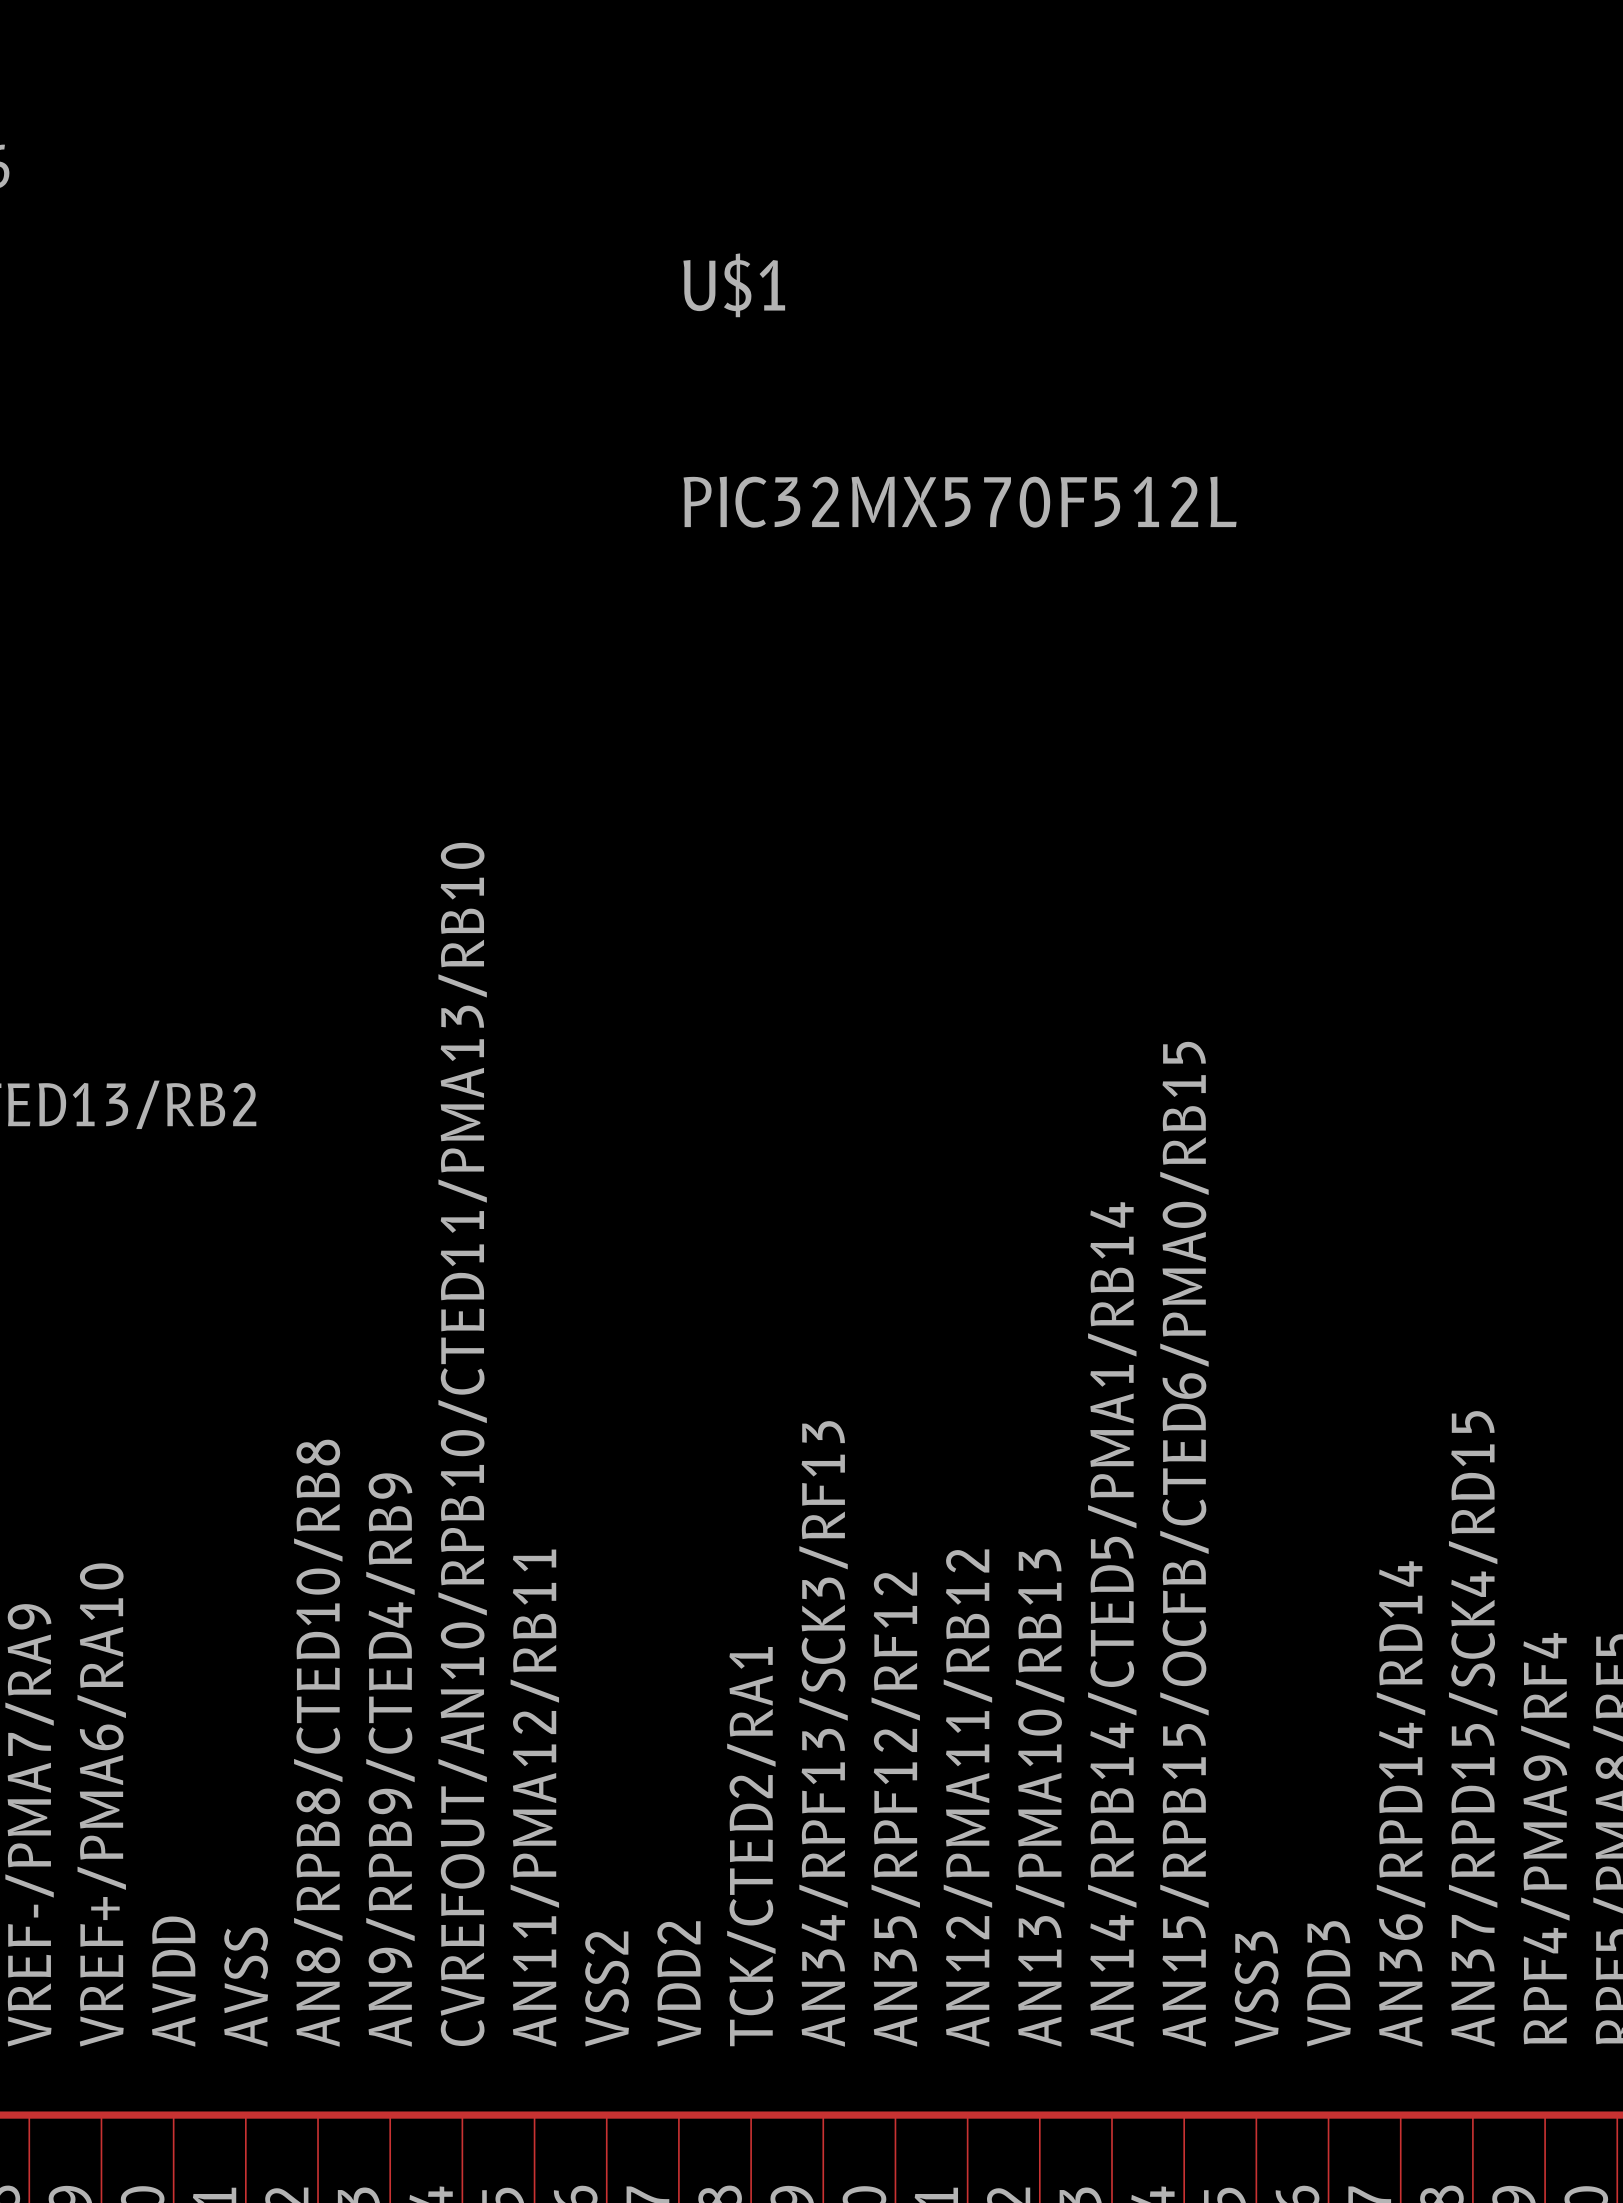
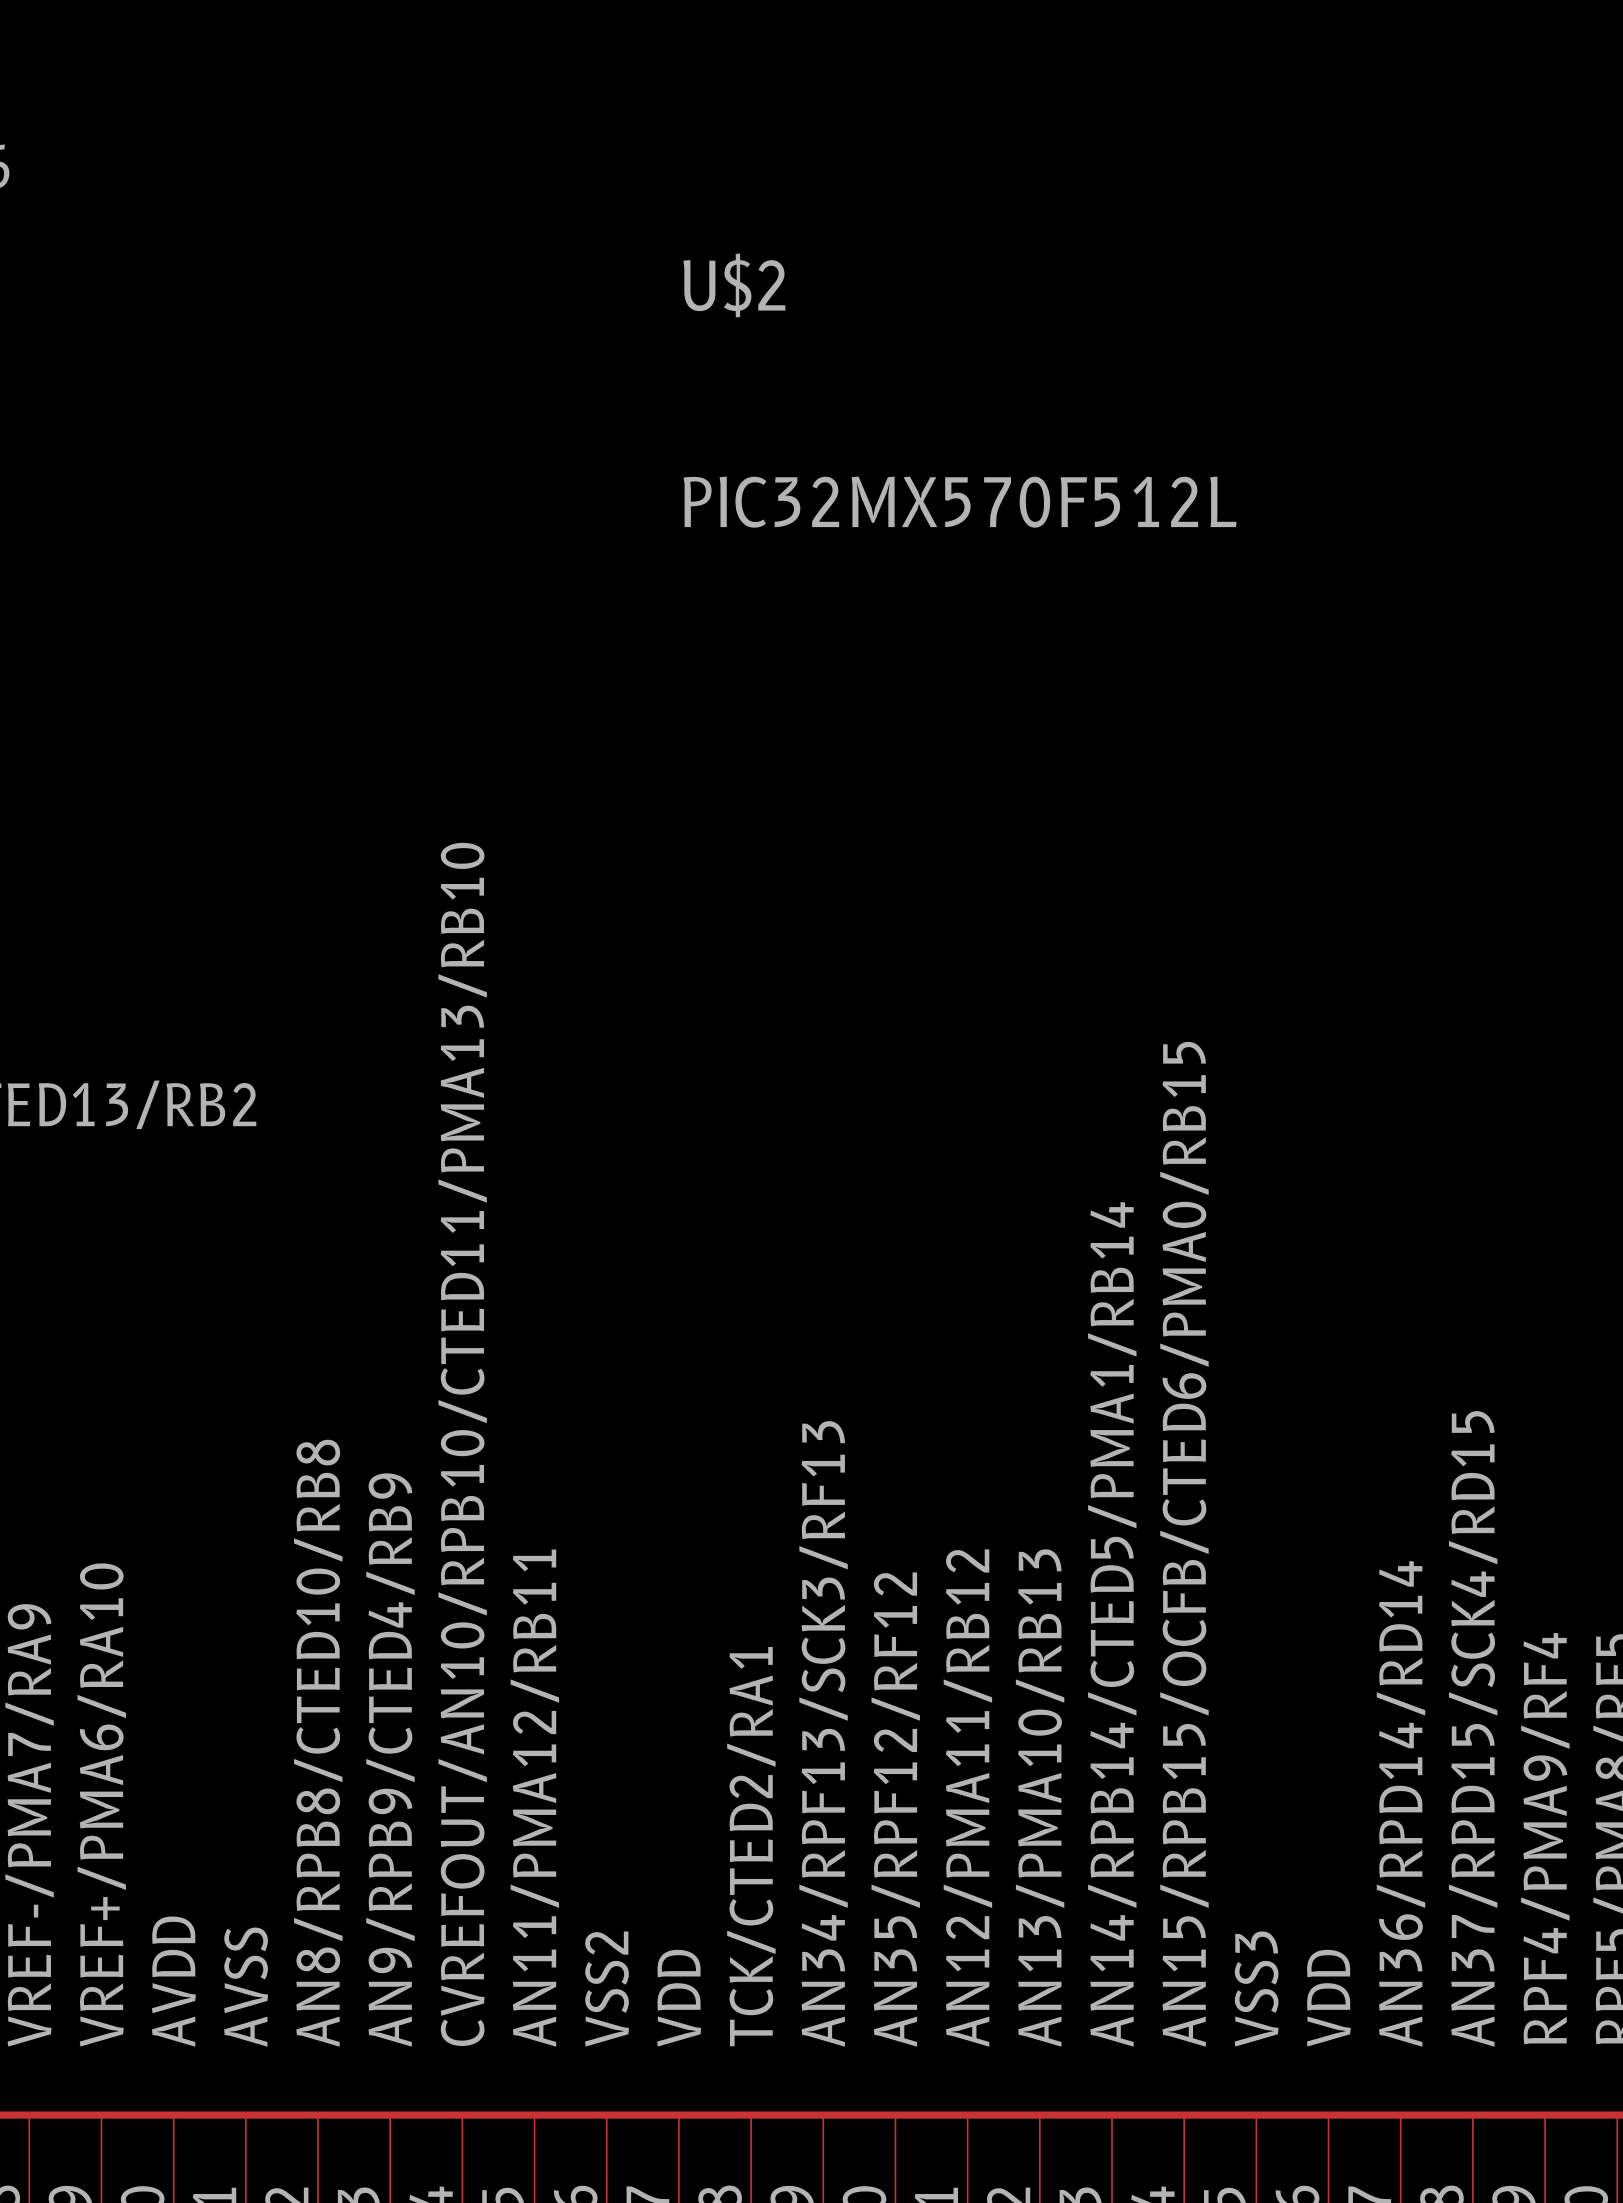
U$1 name: U$1 (734, 285) -> U$2 (734, 285)
U$1 pin name: VDD2 (679, 1983) -> VDD (679, 1998)
U$1 pin name: VDD3 (1328, 1983) -> VDD (1328, 1998)

